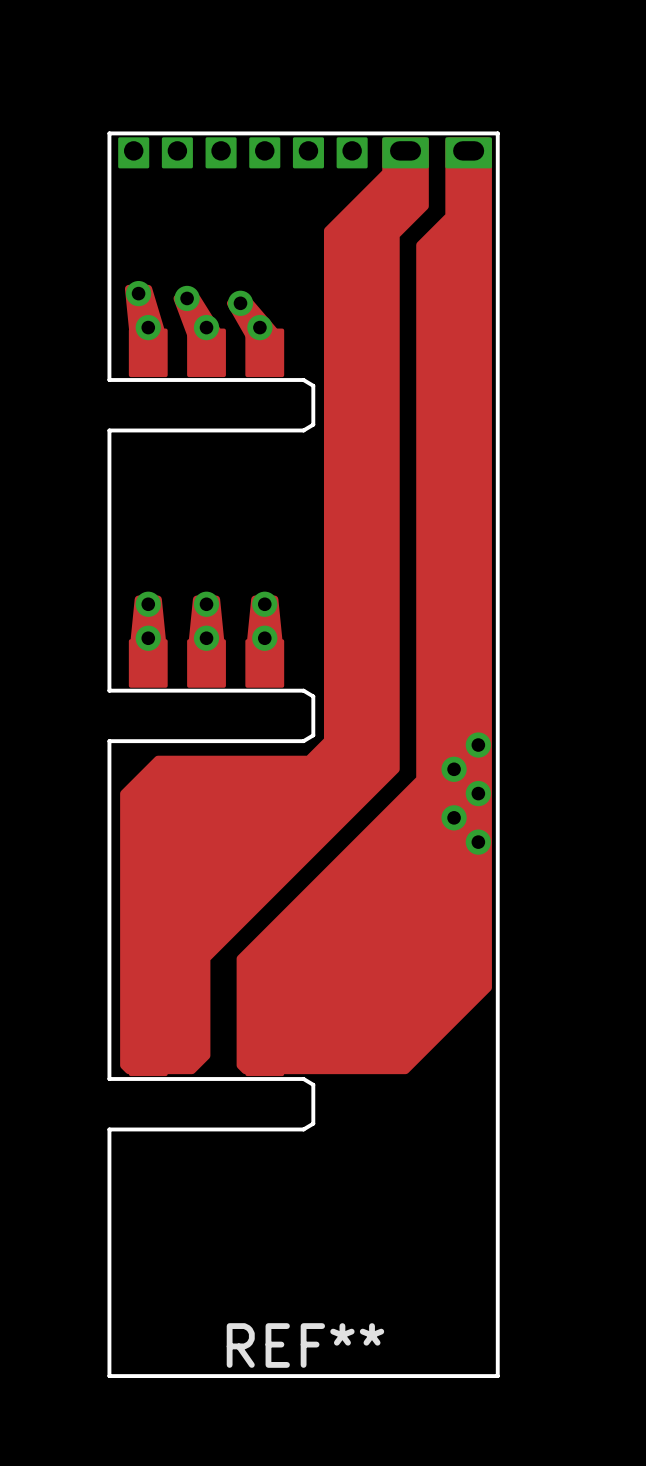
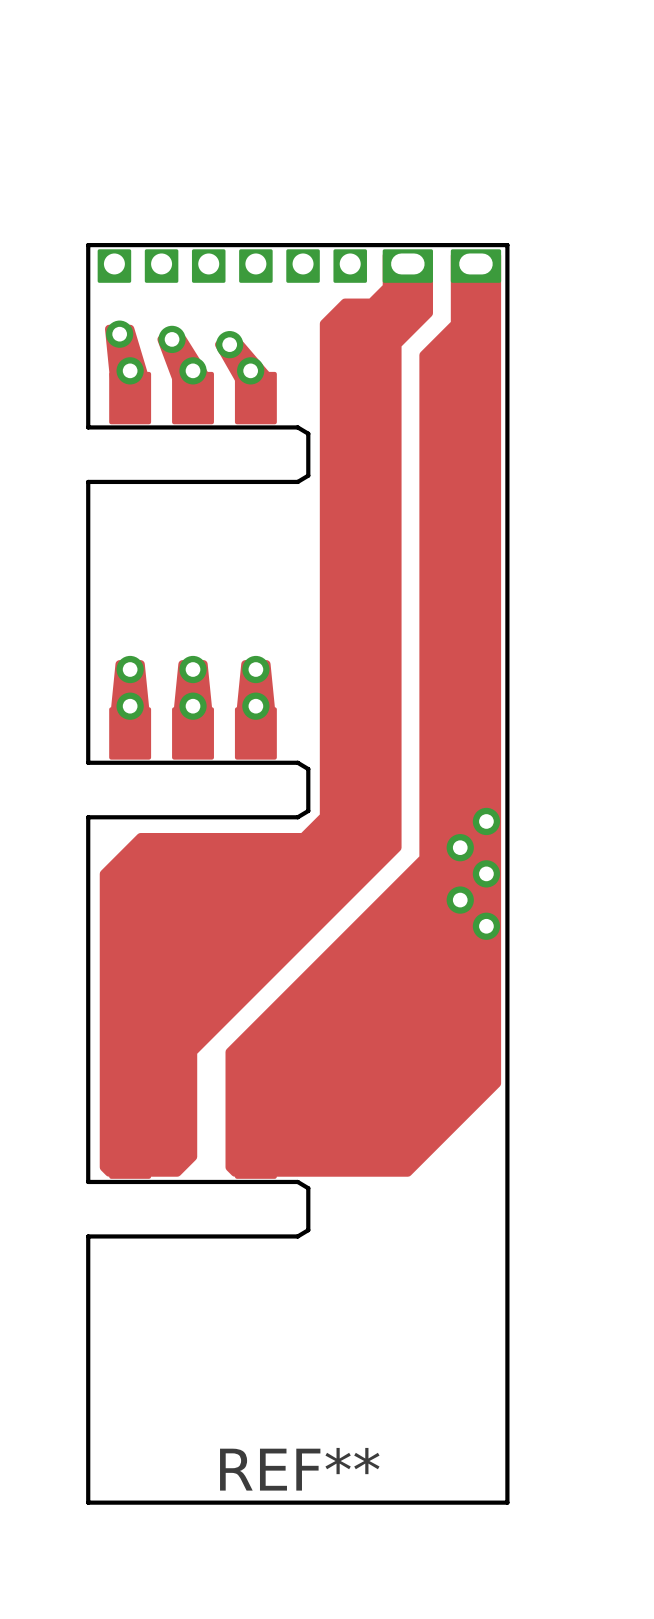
REF** footprint: [107, 131, 500, 1379] -> [86, 243, 510, 1505]
drawing: [120, 137, 492, 1075] -> none
drawing: none -> [99, 251, 502, 1177]

